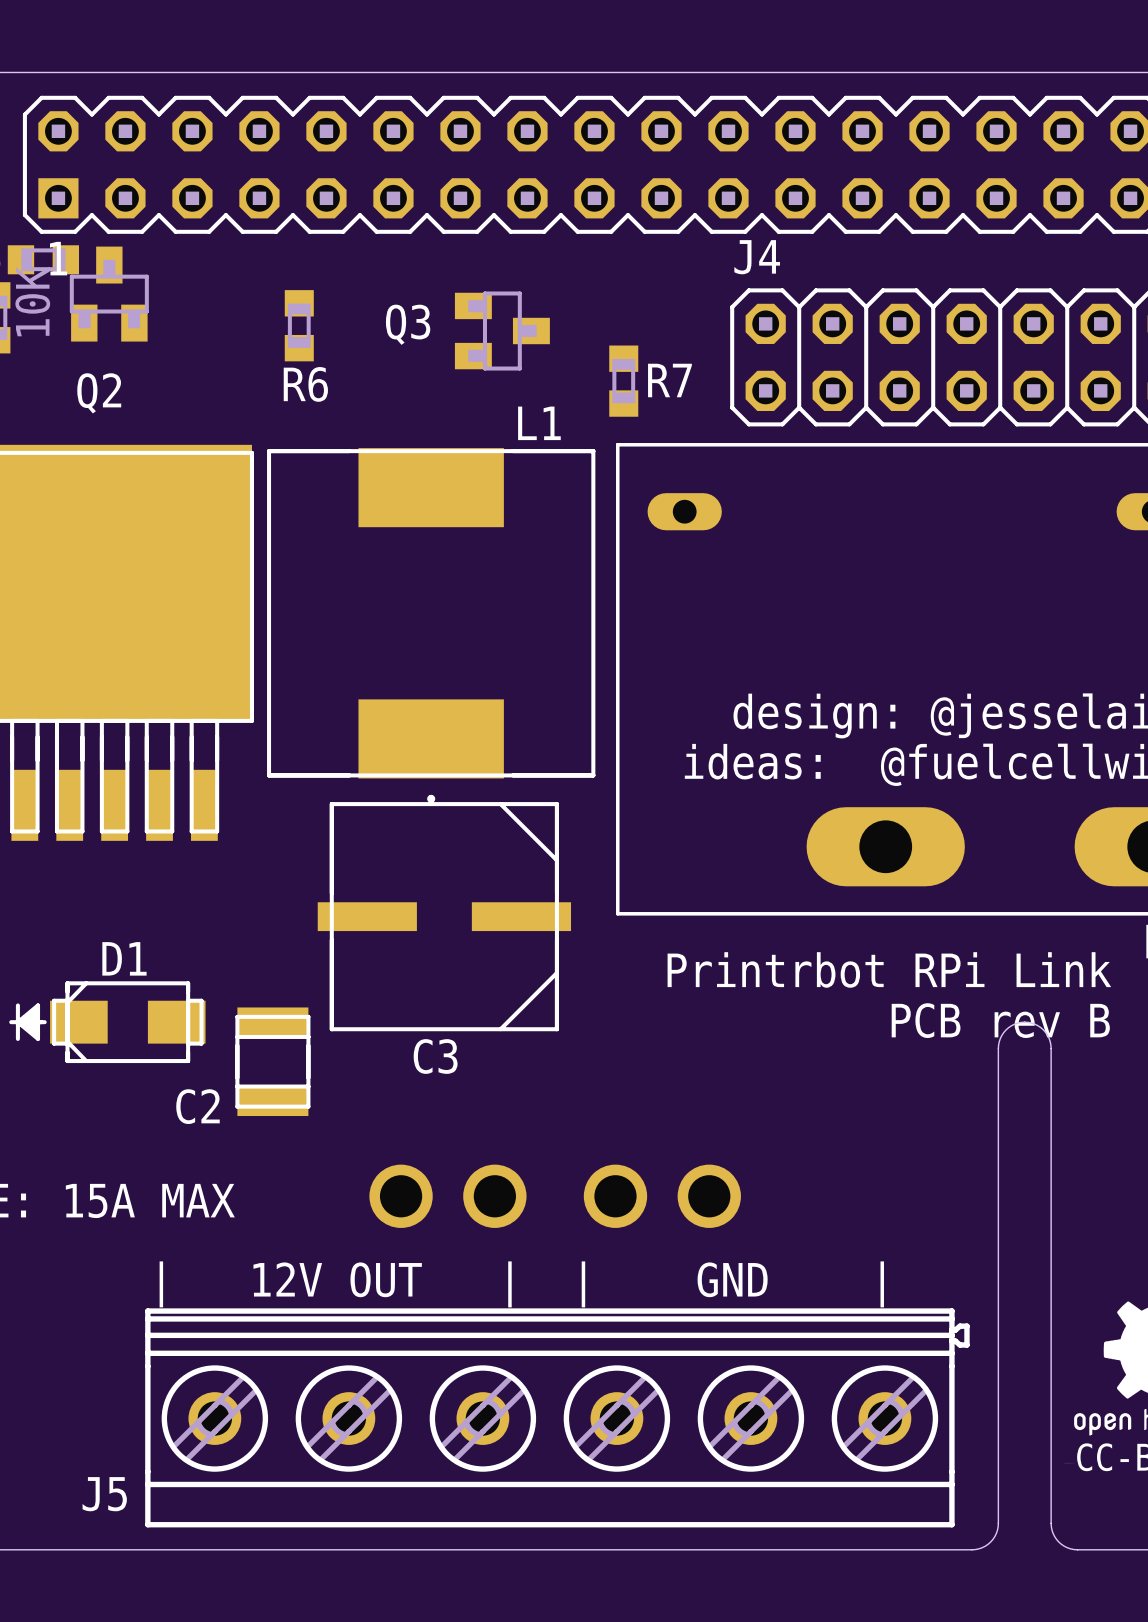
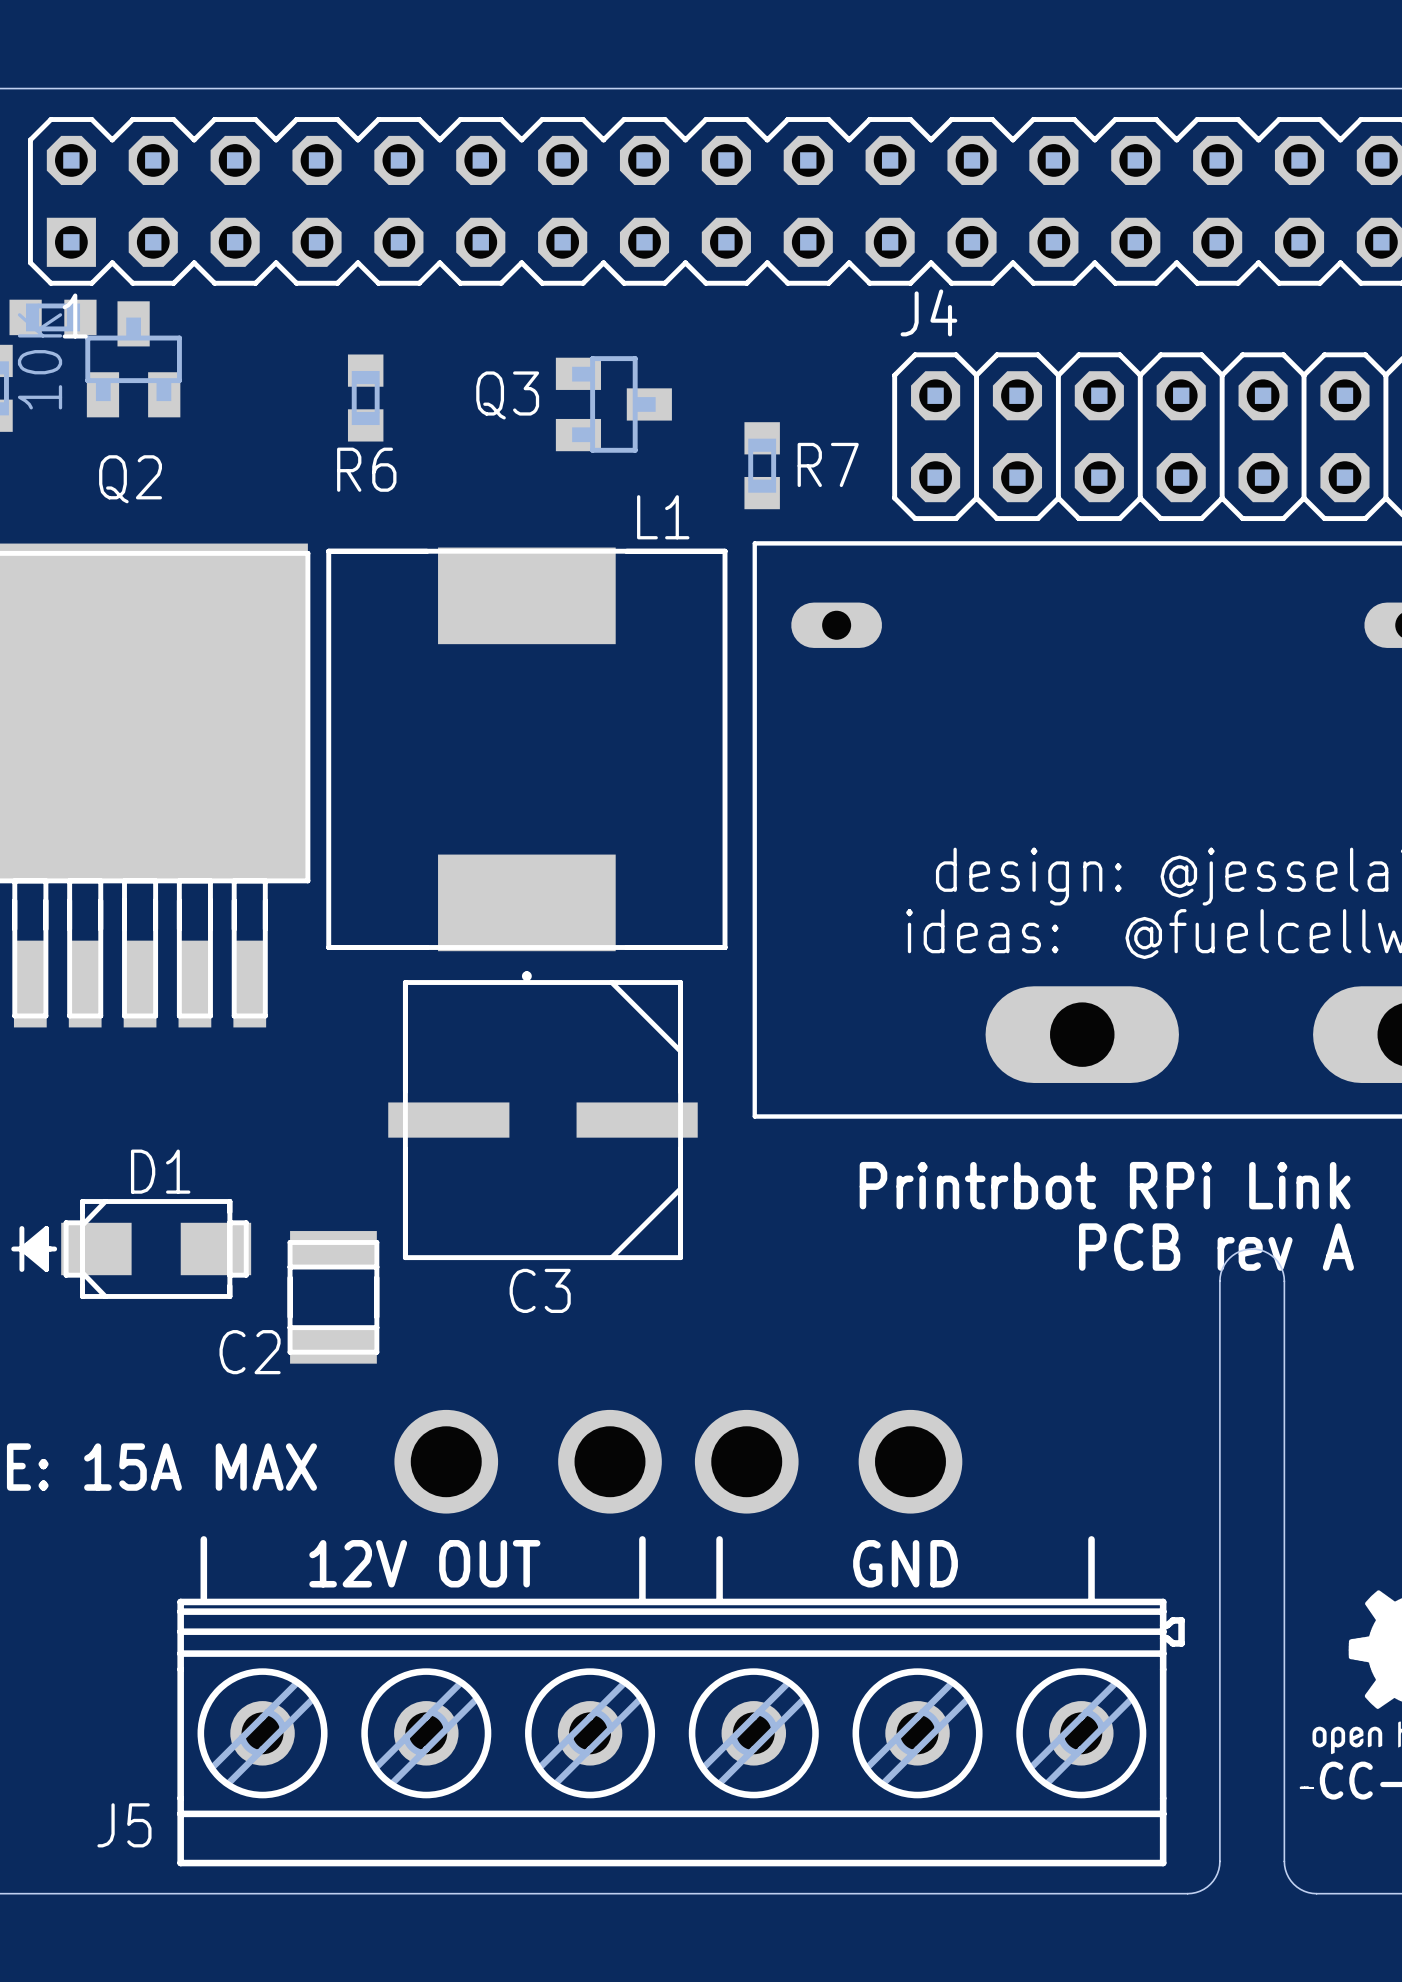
text: PCB rev B (1000, 1020) -> PCB rev A (1216, 1247)
part footprint: [369, 1164, 741, 1228] -> [394, 1409, 963, 1514]

